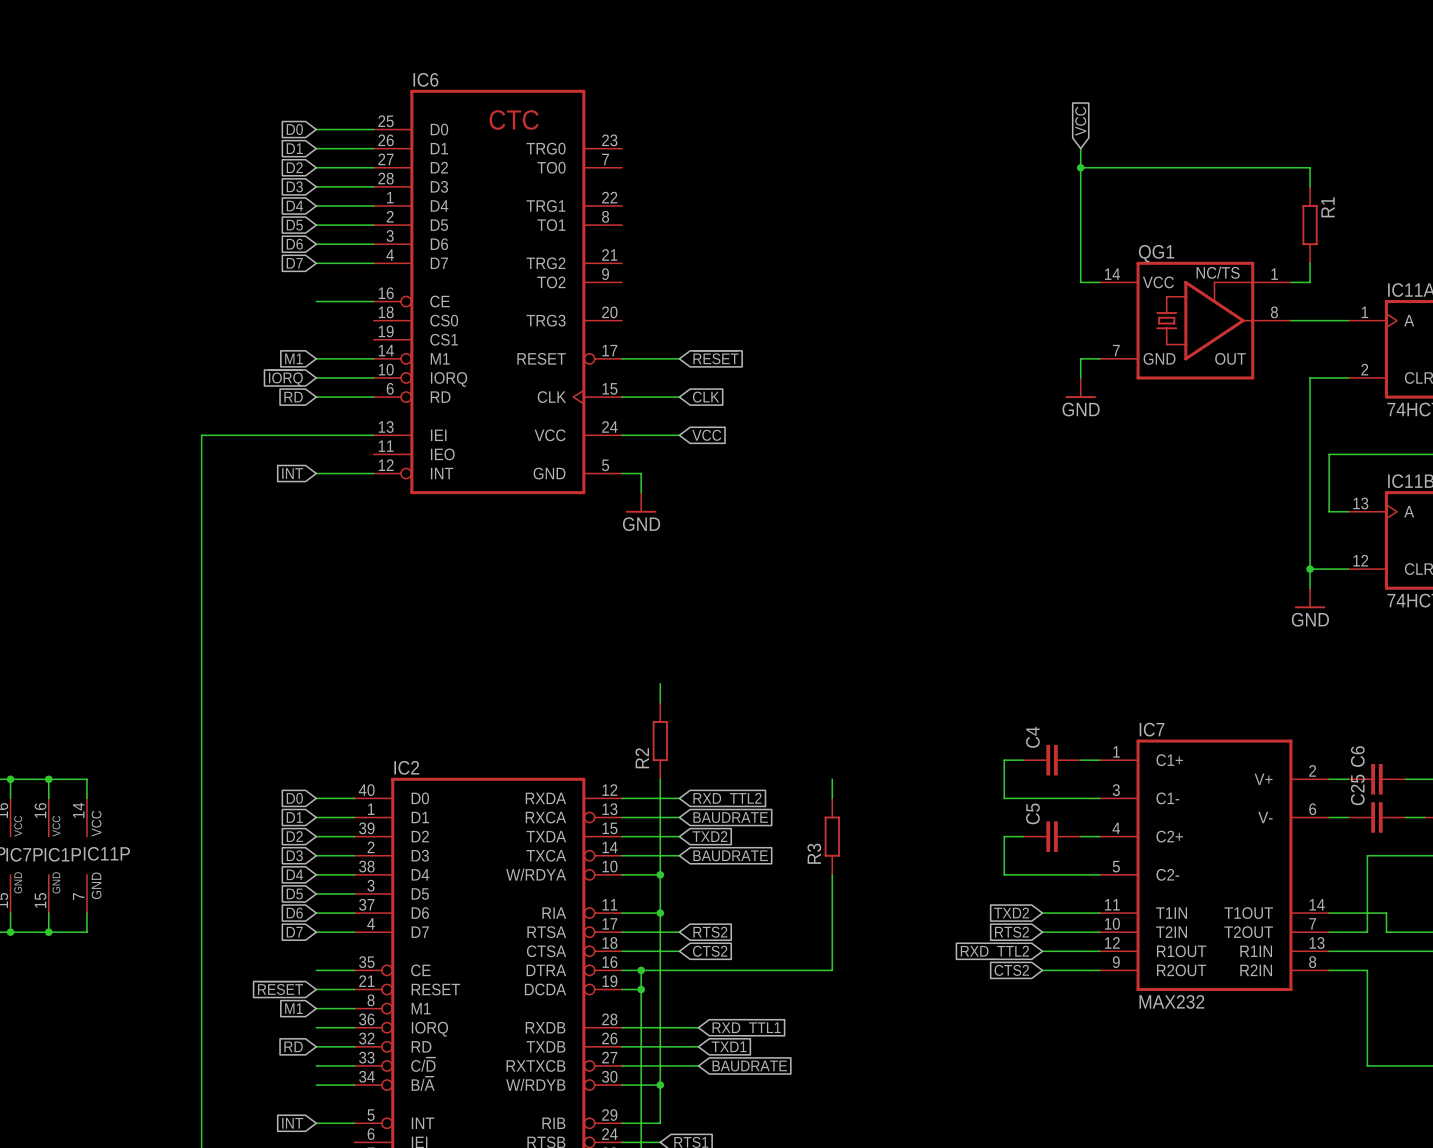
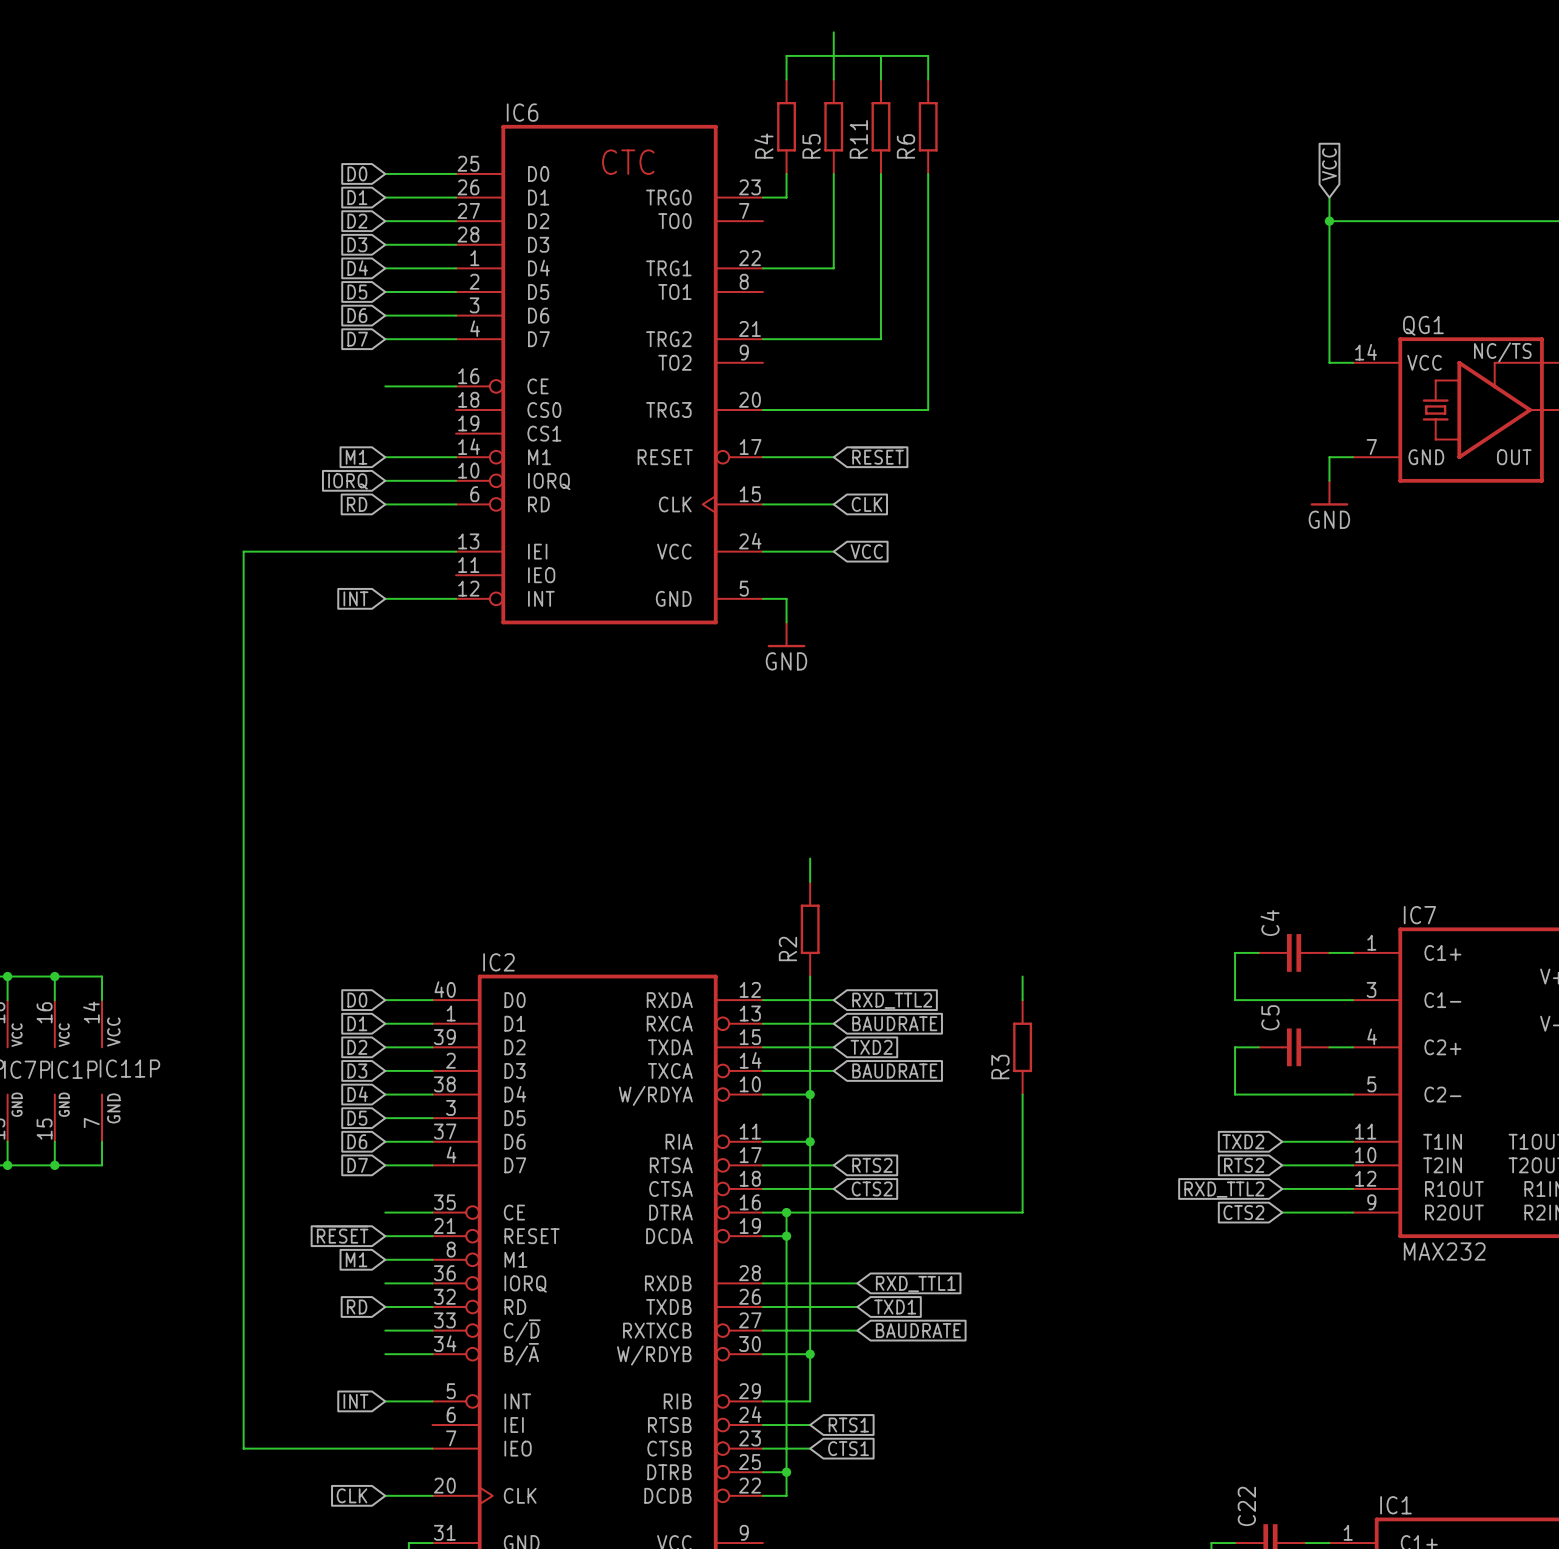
wire: none -> (833, 32) (833, 79)
wire: none -> (880, 55) (880, 79)
wire: none -> (786, 79) (786, 55) (928, 55) (928, 79)
R4: none -> (786, 126)
R5: none -> (833, 126)
R11: none -> (880, 126)
R6: none -> (928, 126)
wire: none -> (786, 173) (786, 197) (762, 197)
wire: none -> (833, 173) (833, 268) (762, 268)
wire: none -> (880, 173) (880, 339) (762, 339)
wire: none -> (928, 173) (928, 410) (762, 410)

